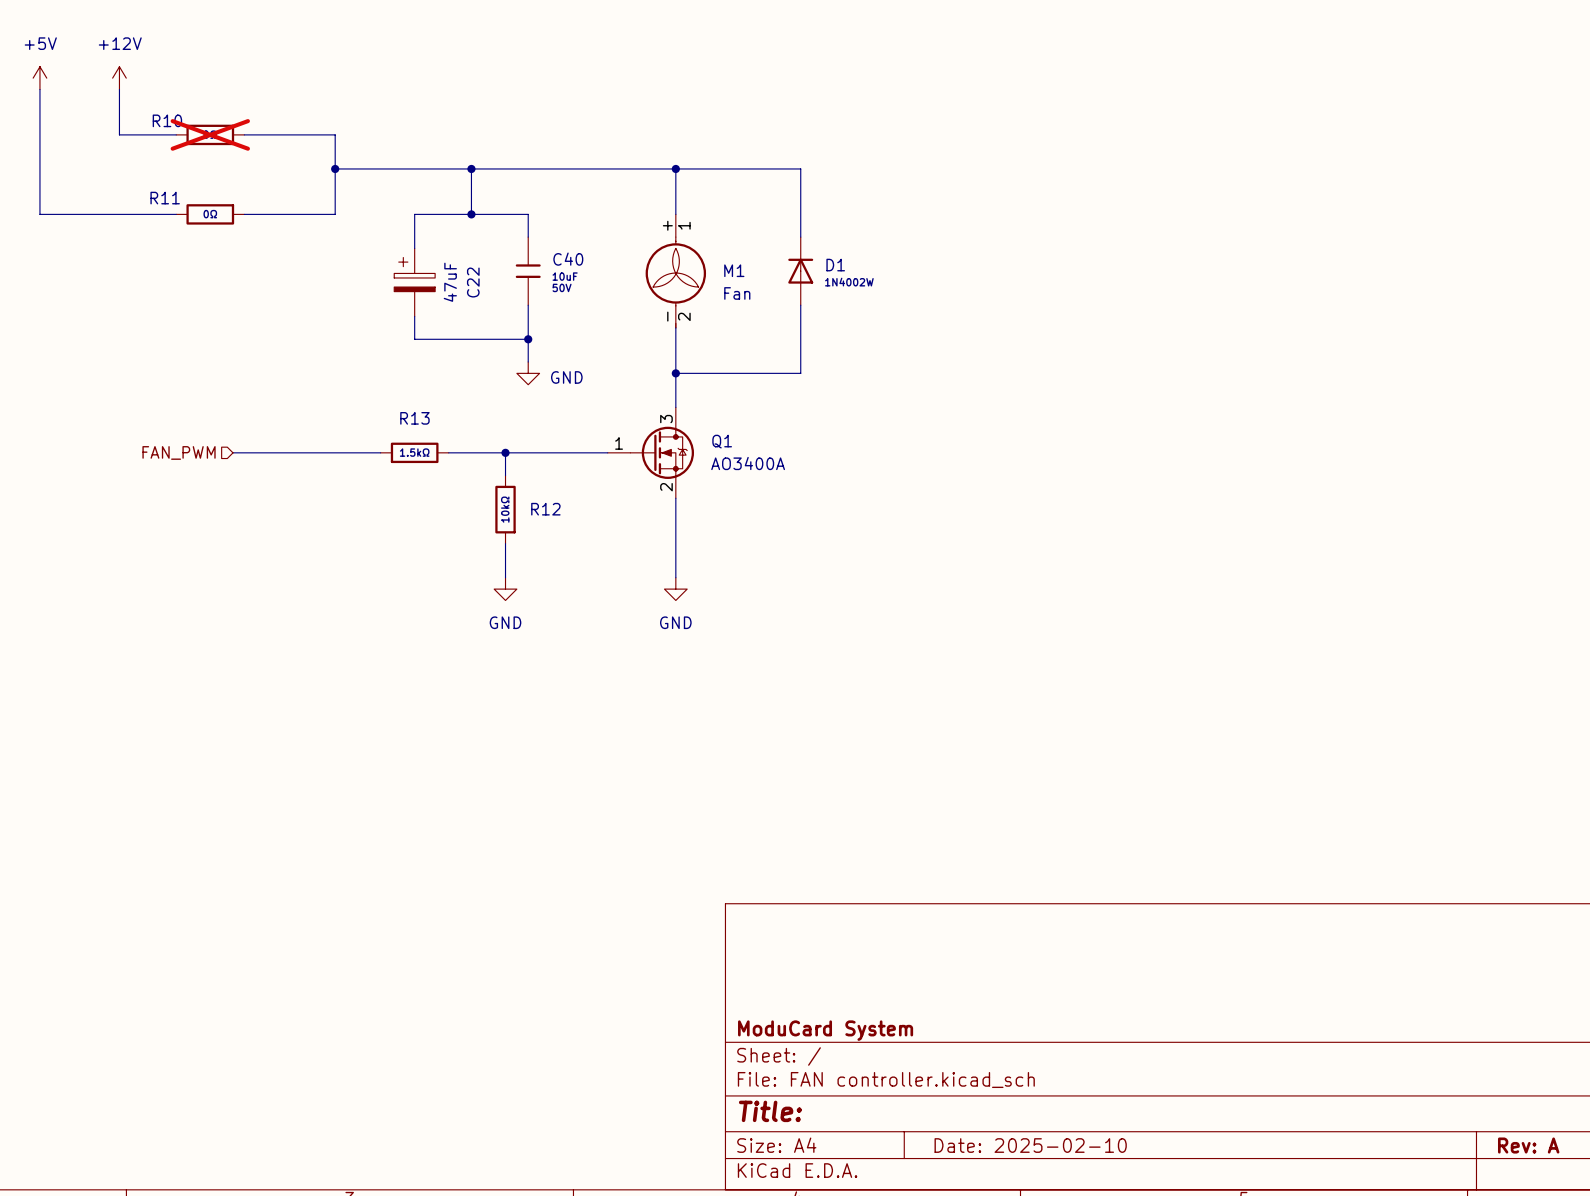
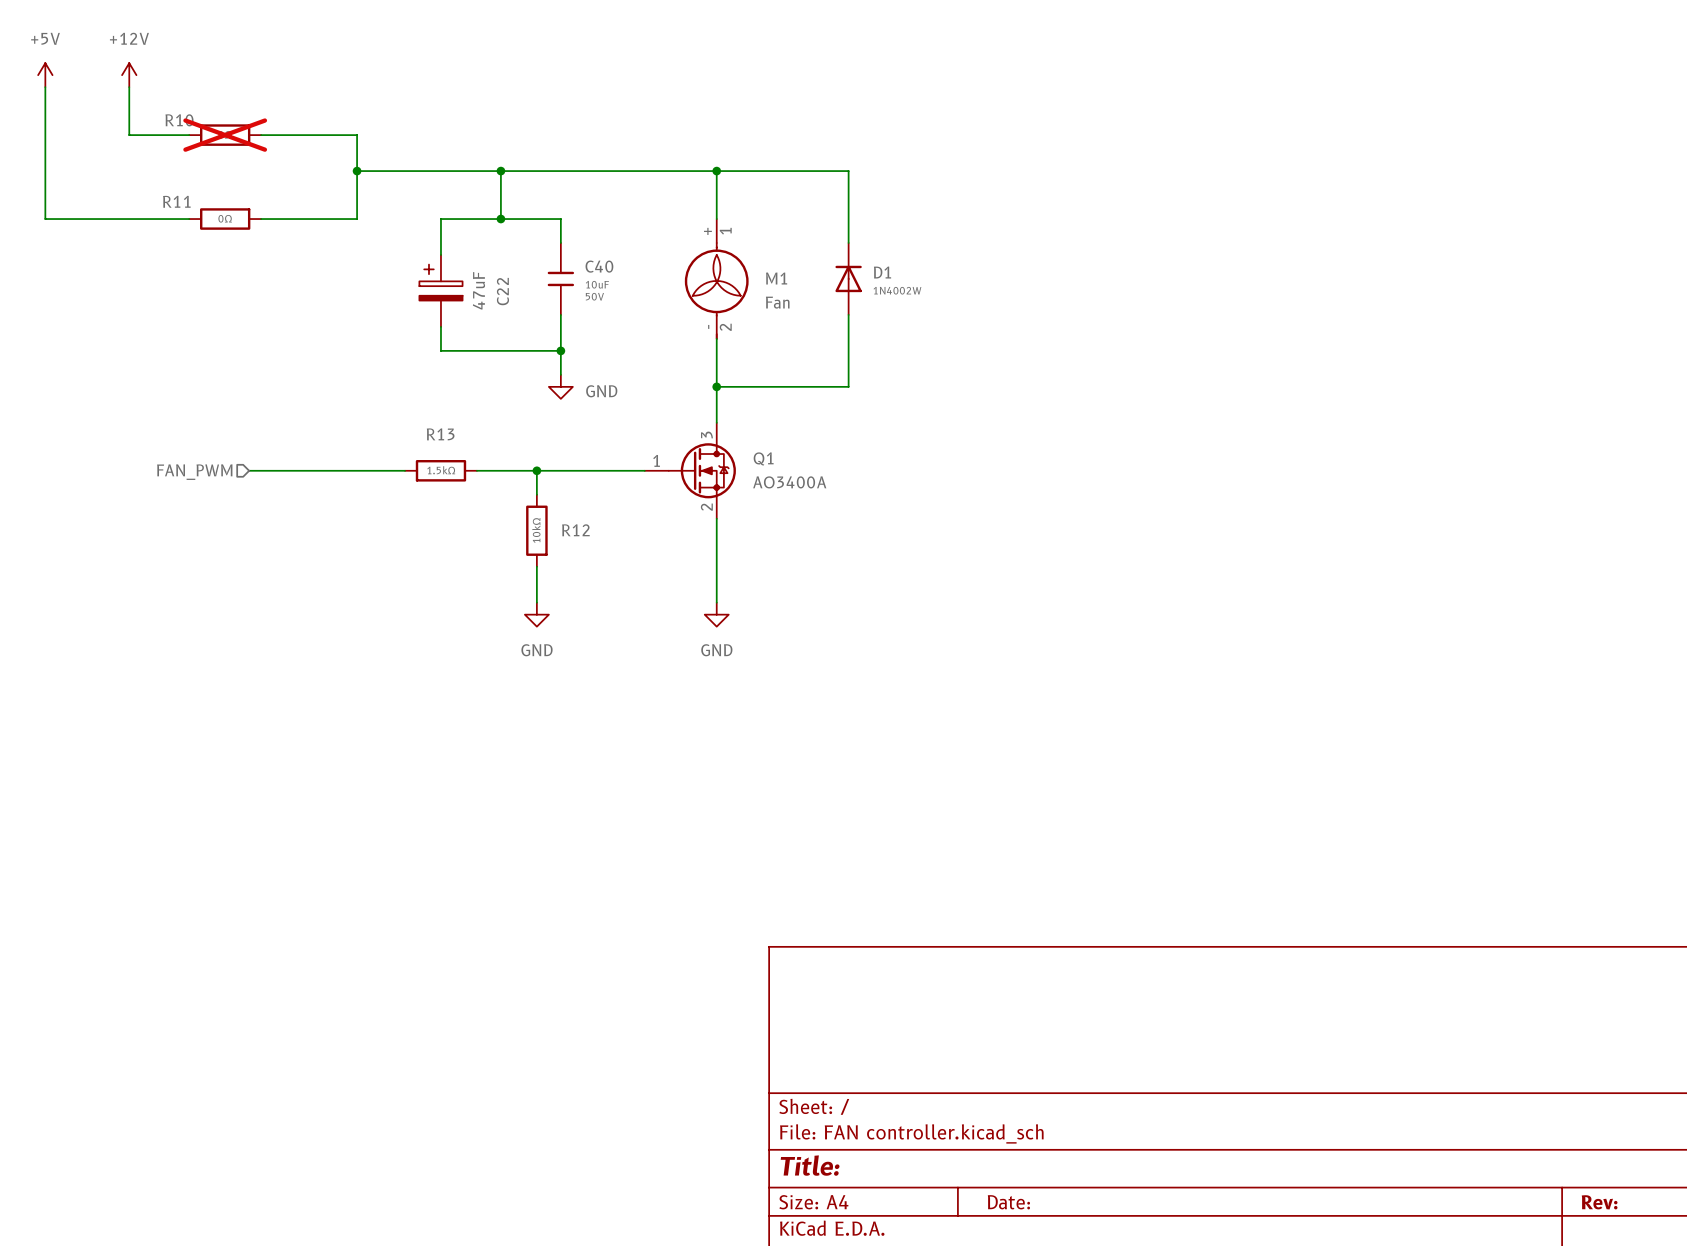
title block: ModuCard System (825, 1030) -> none
title block: Date: 2025-02-10 (1030, 1145) -> Date: (1008, 1202)
title block: Rev: A (1528, 1145) -> Rev: (1599, 1202)

